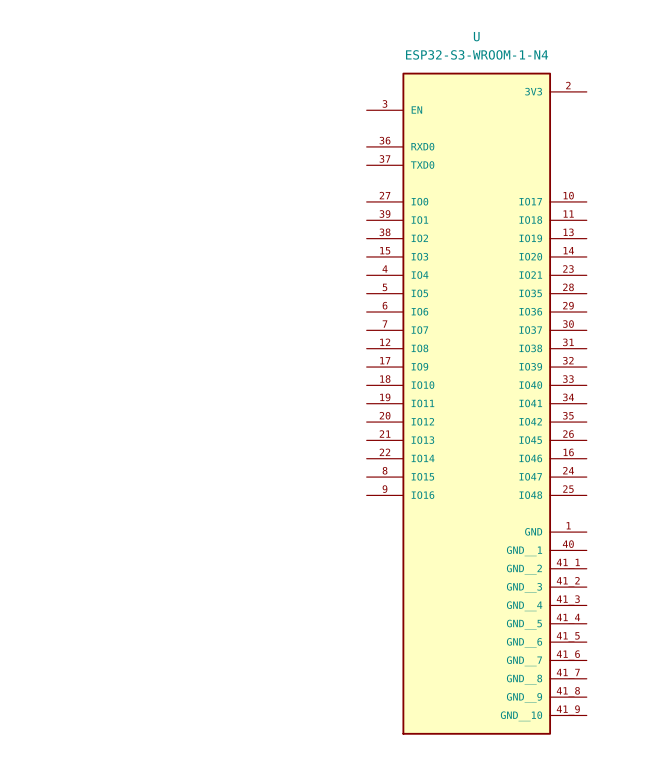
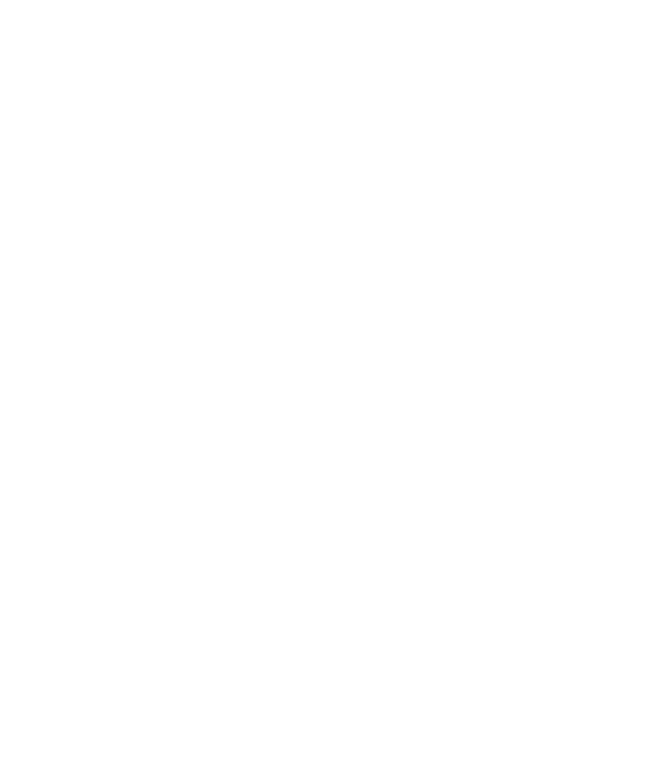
U: ESP32-S3-WROOM-1-N4 (476, 403) -> none

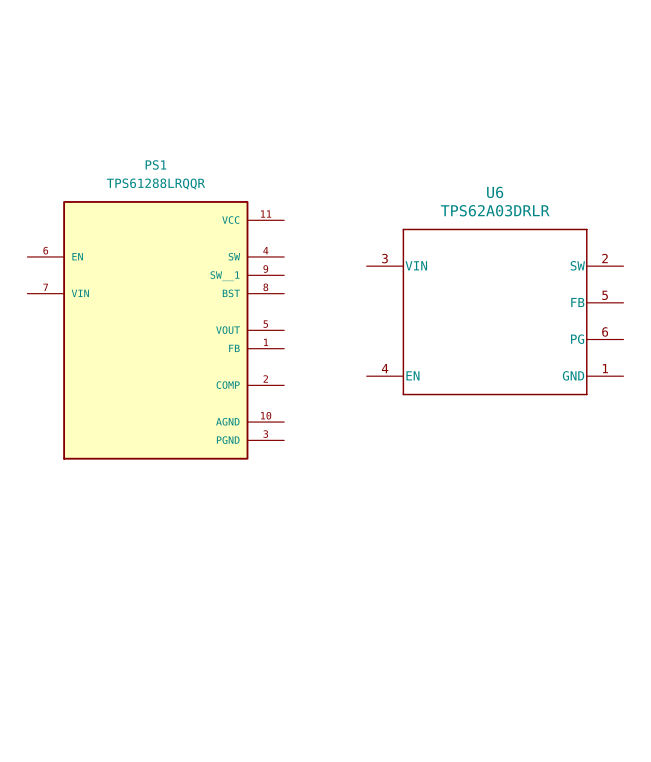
U6: none -> TPS62A03DRLR (495, 312)
PS1: none -> TPS61288LRQQR (155, 330)

